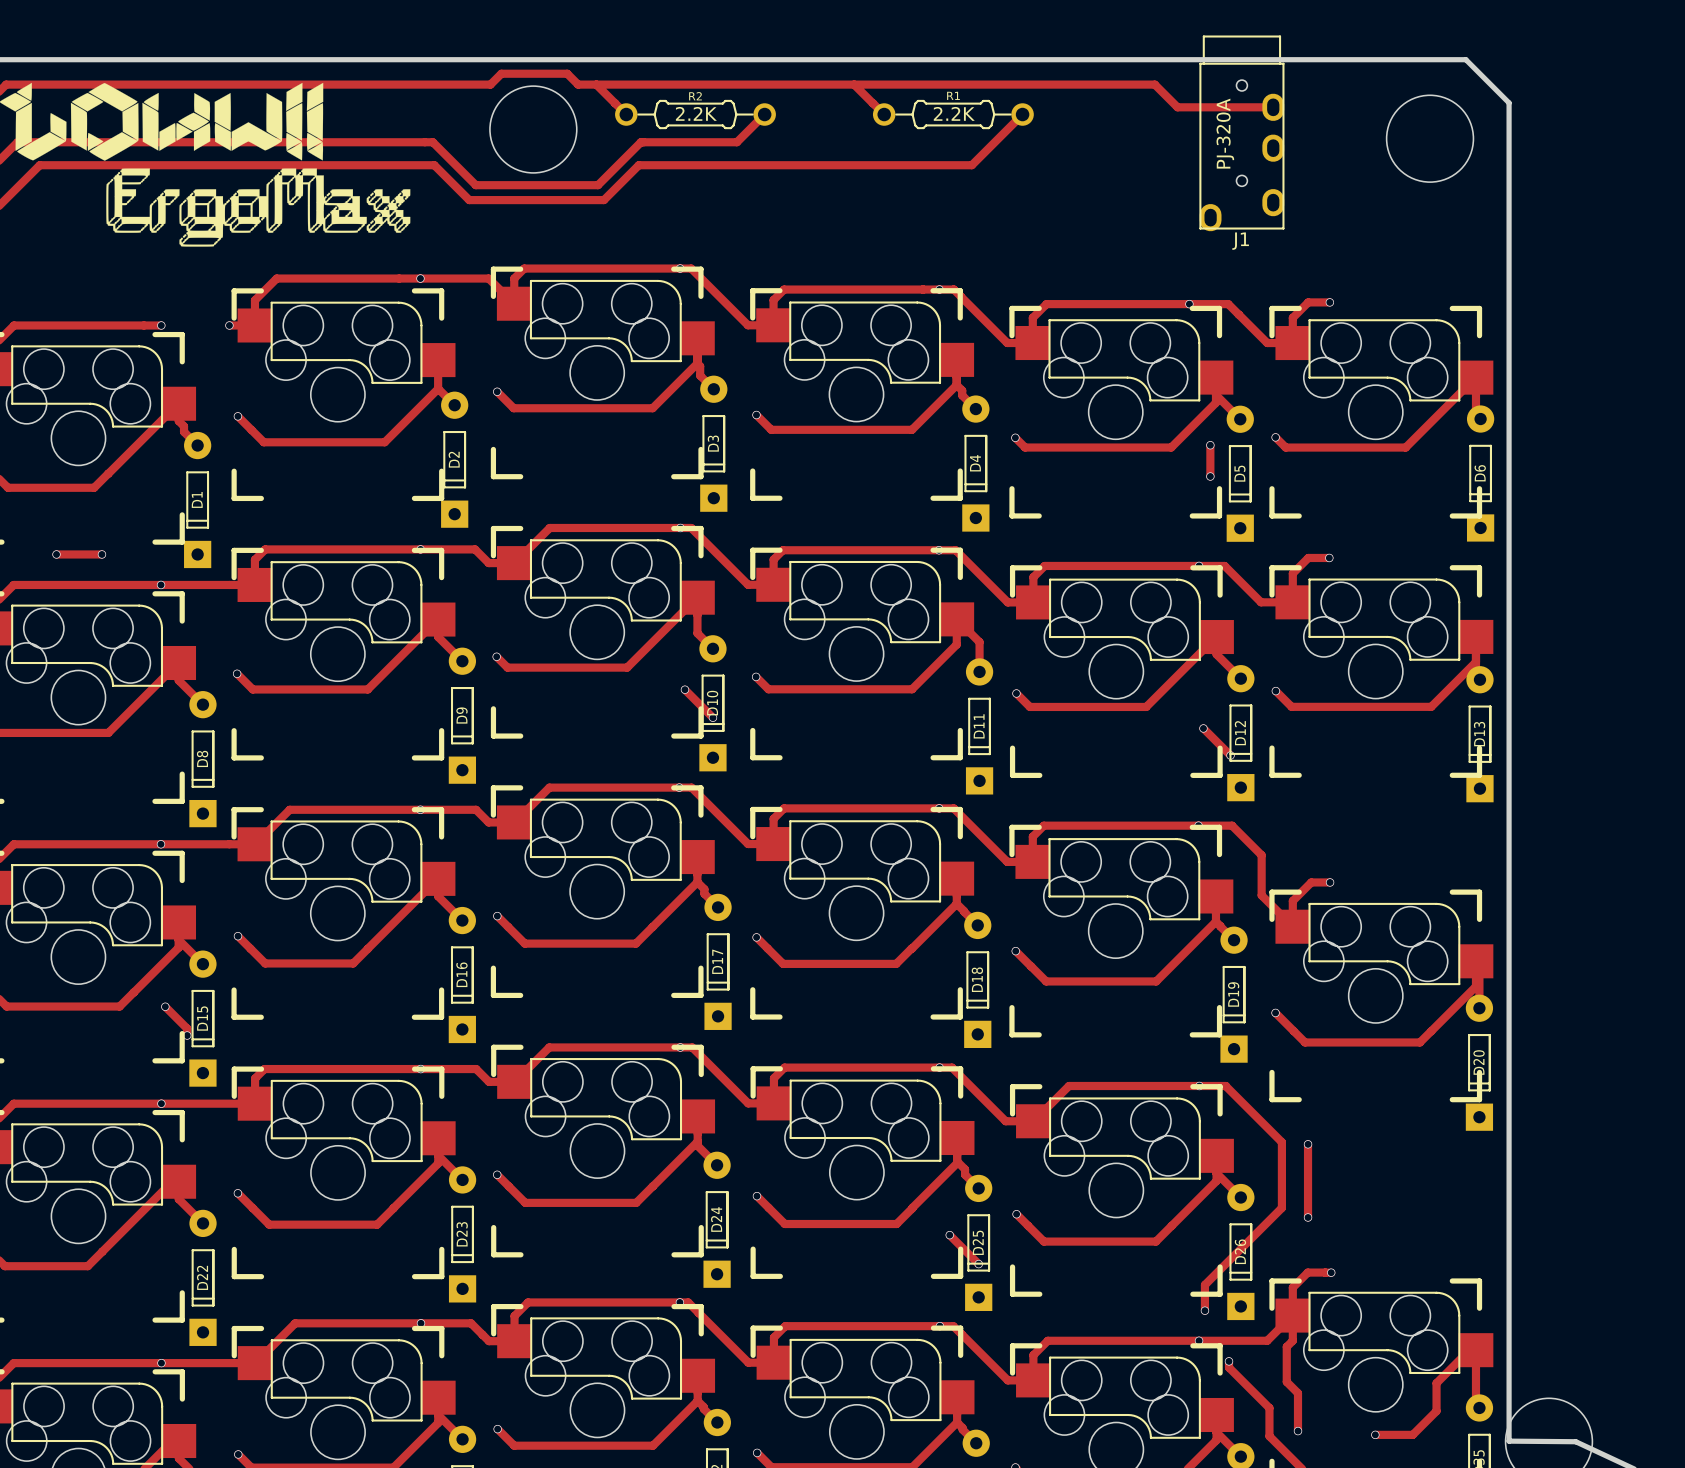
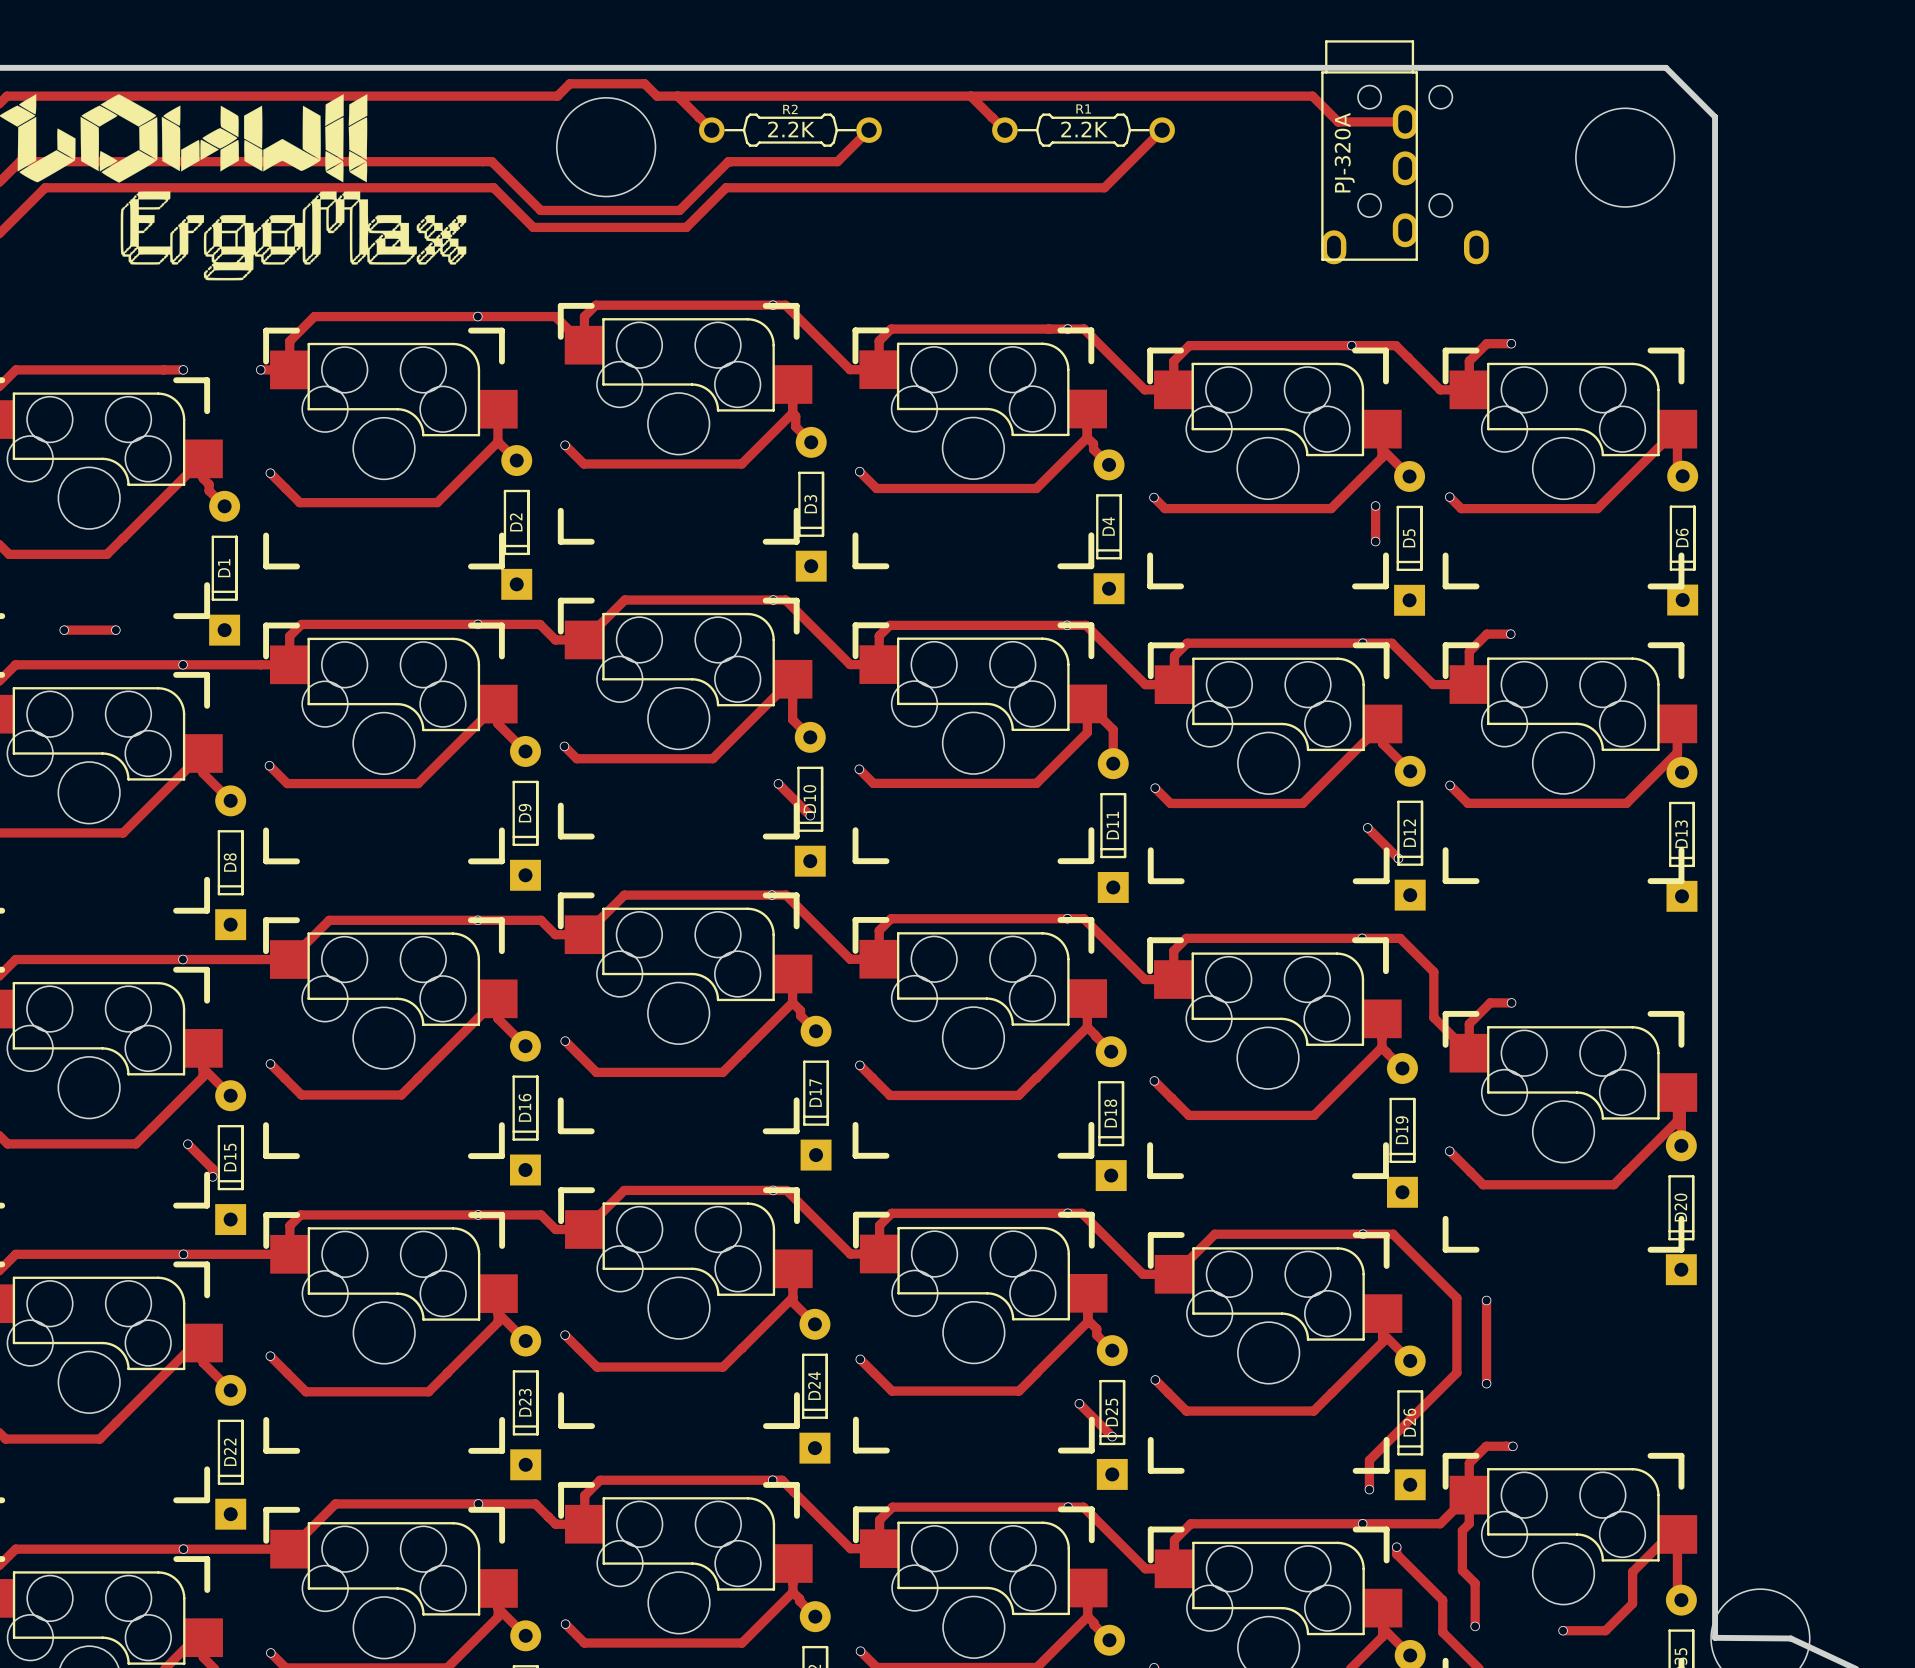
track: (1177, 107) (1273, 107) -> (1338, 121) (1405, 121)
J1: PJ-320A (1241, 133) -> none
part: none -> (1404, 152)

